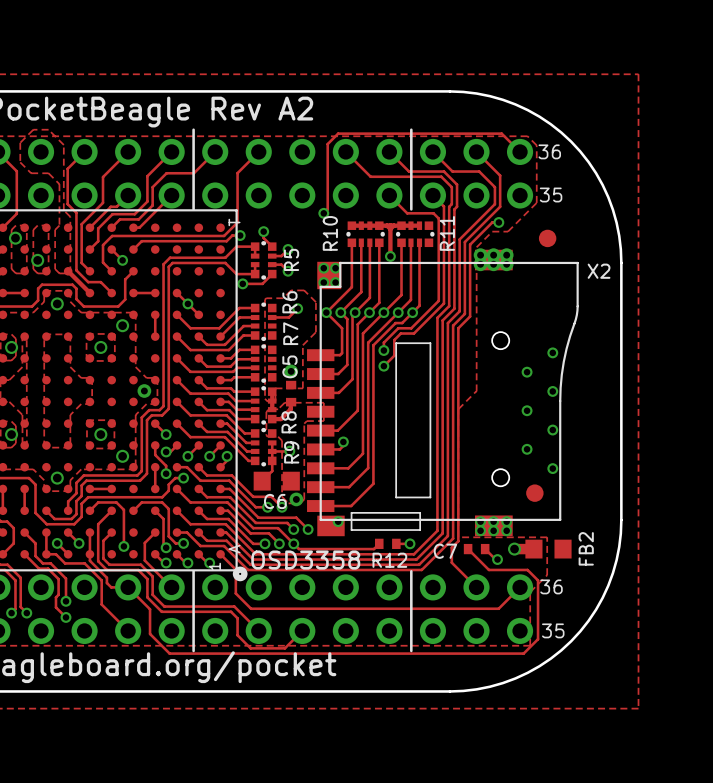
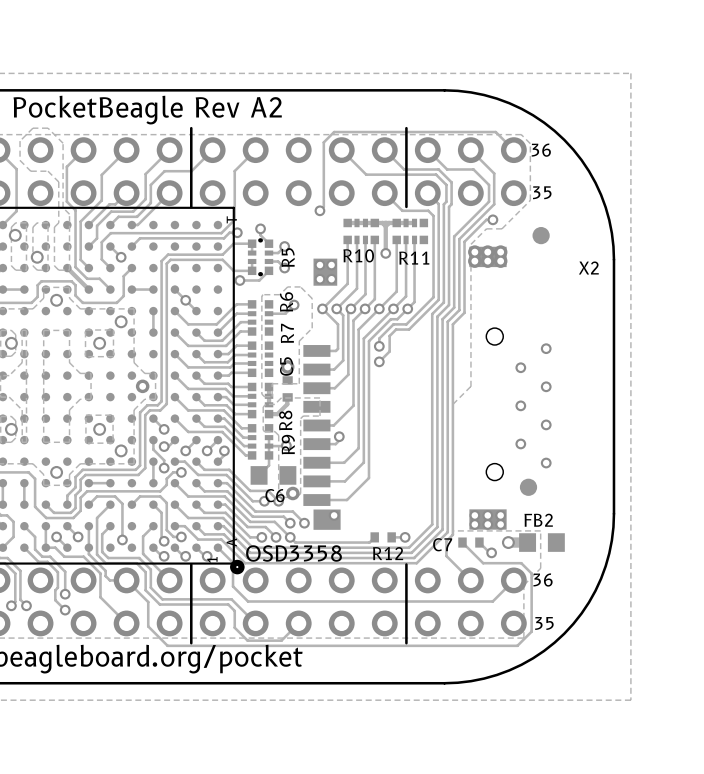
R10 footprint: [346, 221, 385, 248] -> [343, 218, 380, 245]
R11 footprint: [395, 221, 435, 248] -> [392, 218, 429, 245]
R10 name rotation: 0° (330, 233) -> 90° clockwise (358, 255)
R10 name position: R10 (330, 233) -> R10 (358, 255)
R11 name rotation: 0° (447, 233) -> 90° clockwise (414, 258)
X2 footprint: [307, 249, 579, 537] -> [303, 246, 507, 530]
R6 footprint: [250, 302, 277, 342] -> [247, 300, 274, 336]
R7 footprint: [250, 344, 277, 383] -> [247, 341, 274, 378]
R8 footprint: [250, 386, 277, 425] -> [247, 382, 274, 419]
R9 footprint: [250, 427, 277, 467] -> [247, 424, 274, 460]
FB2 name rotation: 0° (586, 548) -> 90° clockwise (538, 520)

